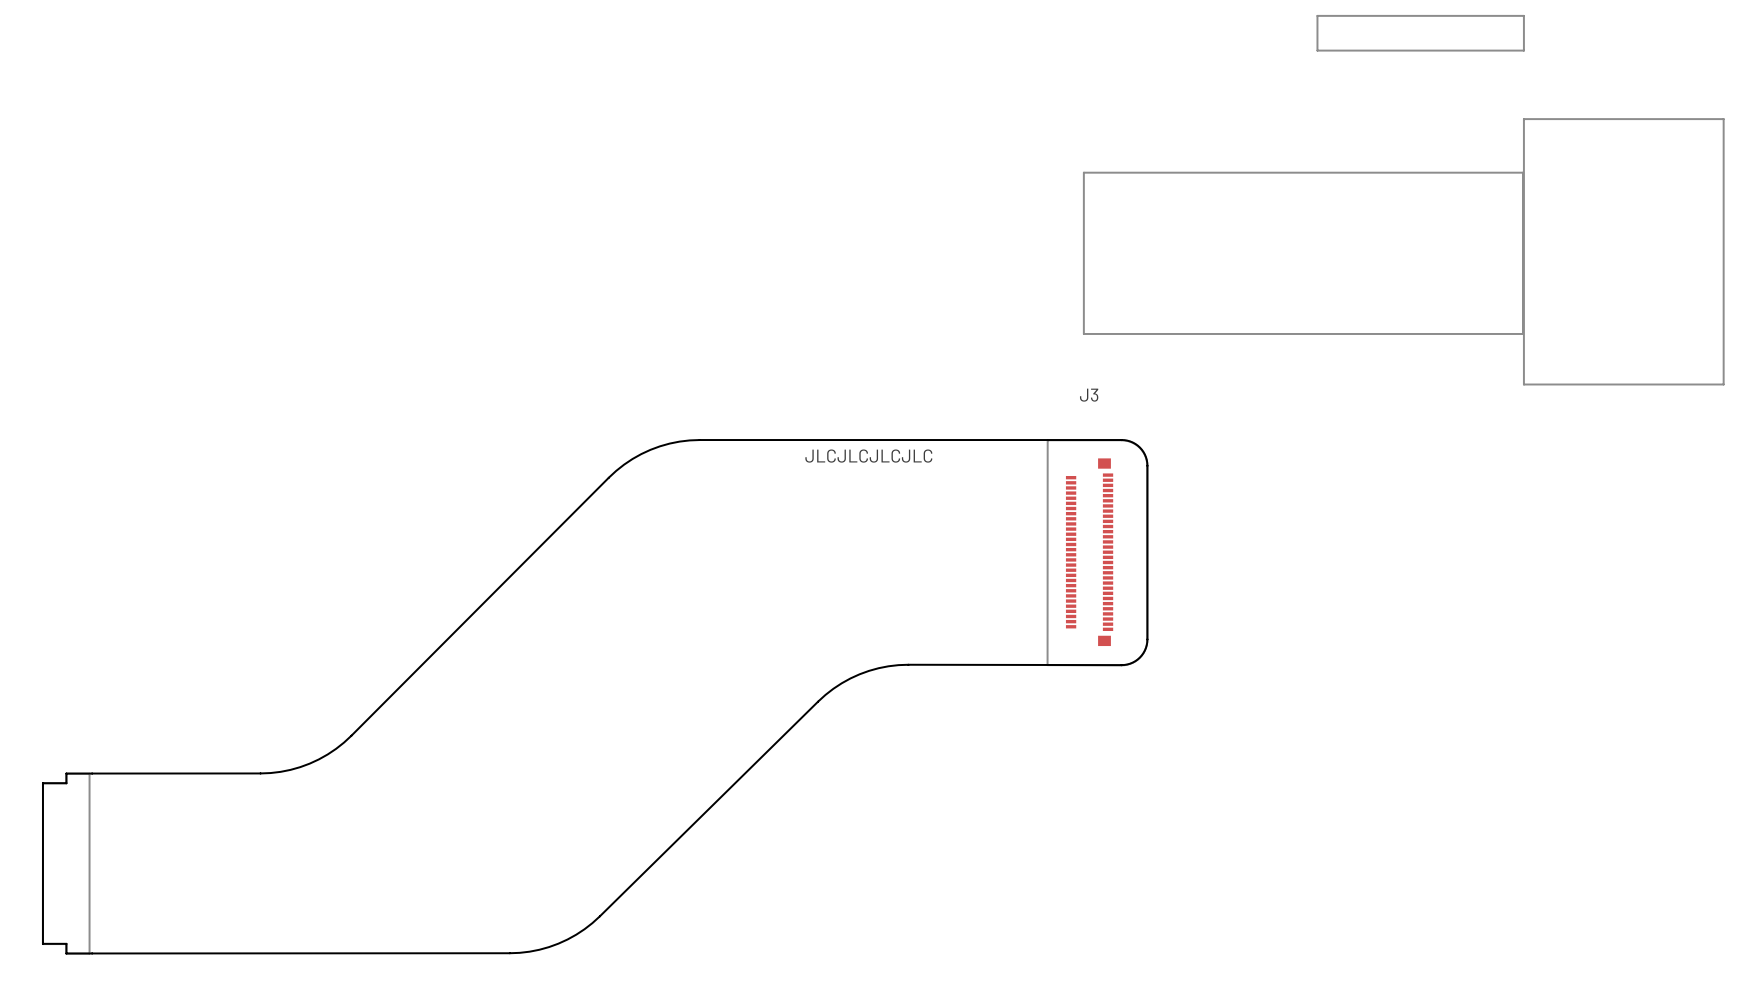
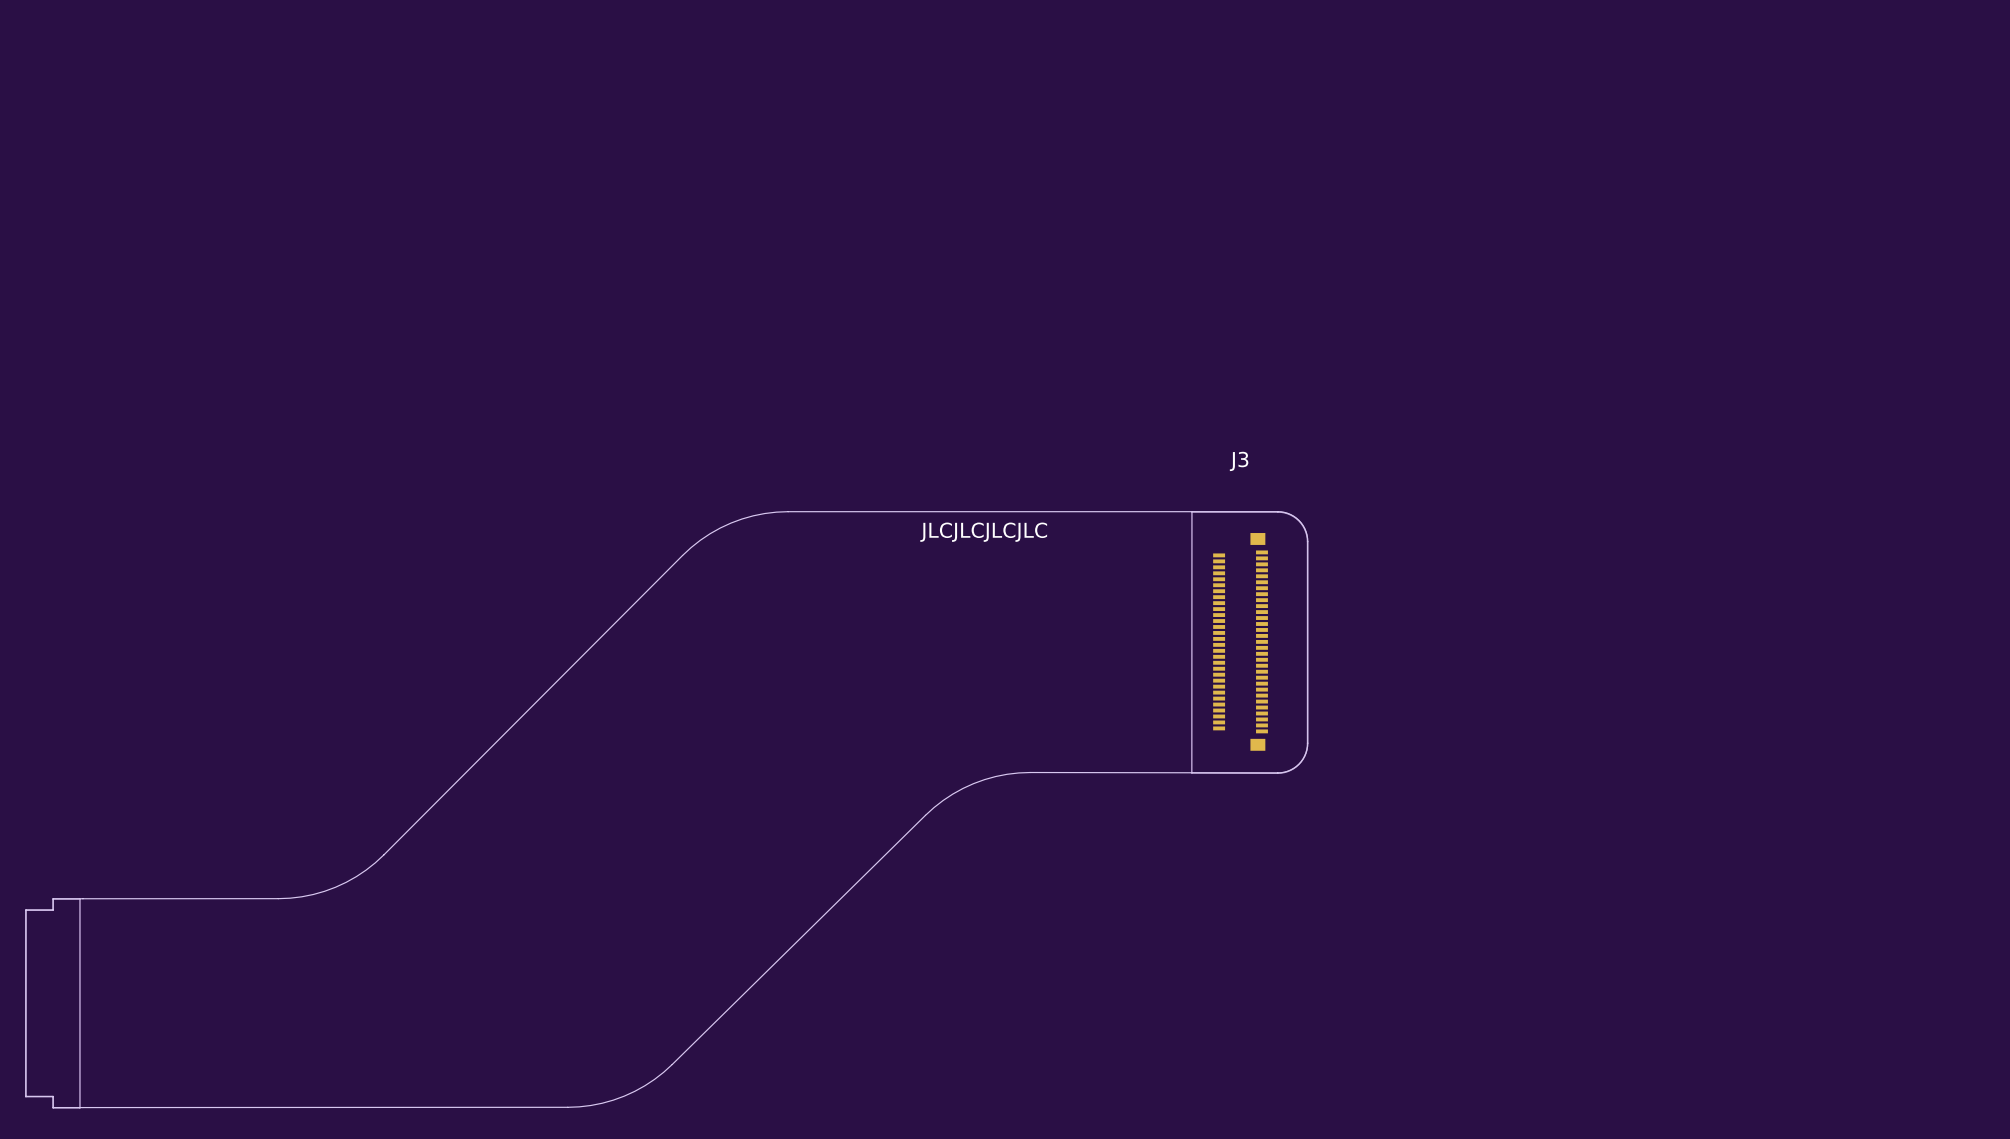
line: (1317, 15) (1523, 15) (1523, 50) (1317, 50) (1317, 15) -> none
line: (1523, 119) (1523, 384) (1723, 384) (1723, 119) (1523, 119) -> none
line: (1083, 172) (1523, 172) (1523, 333) (1083, 333) (1083, 172) -> none

